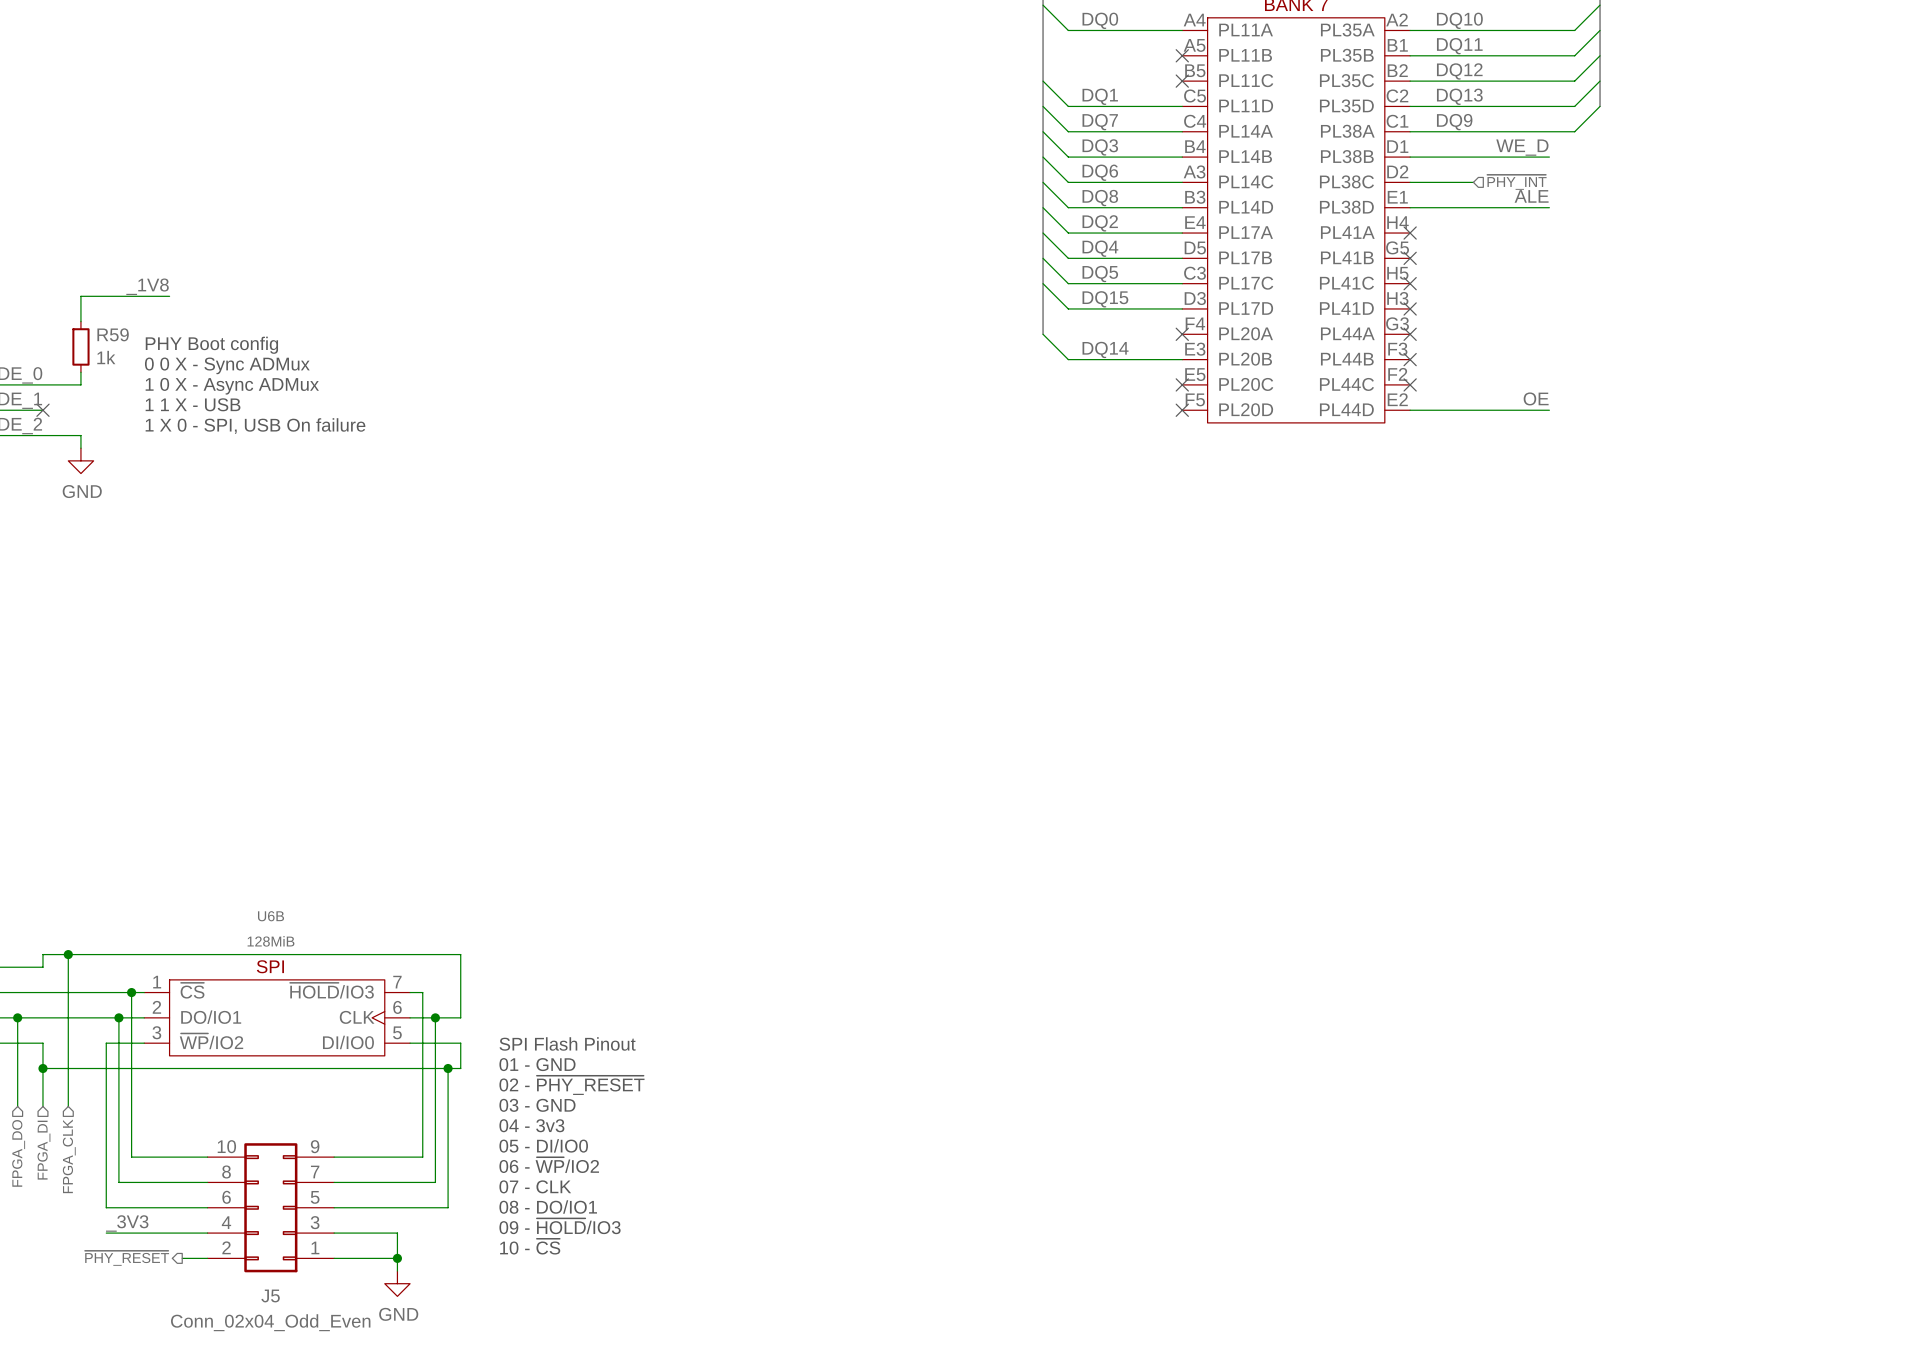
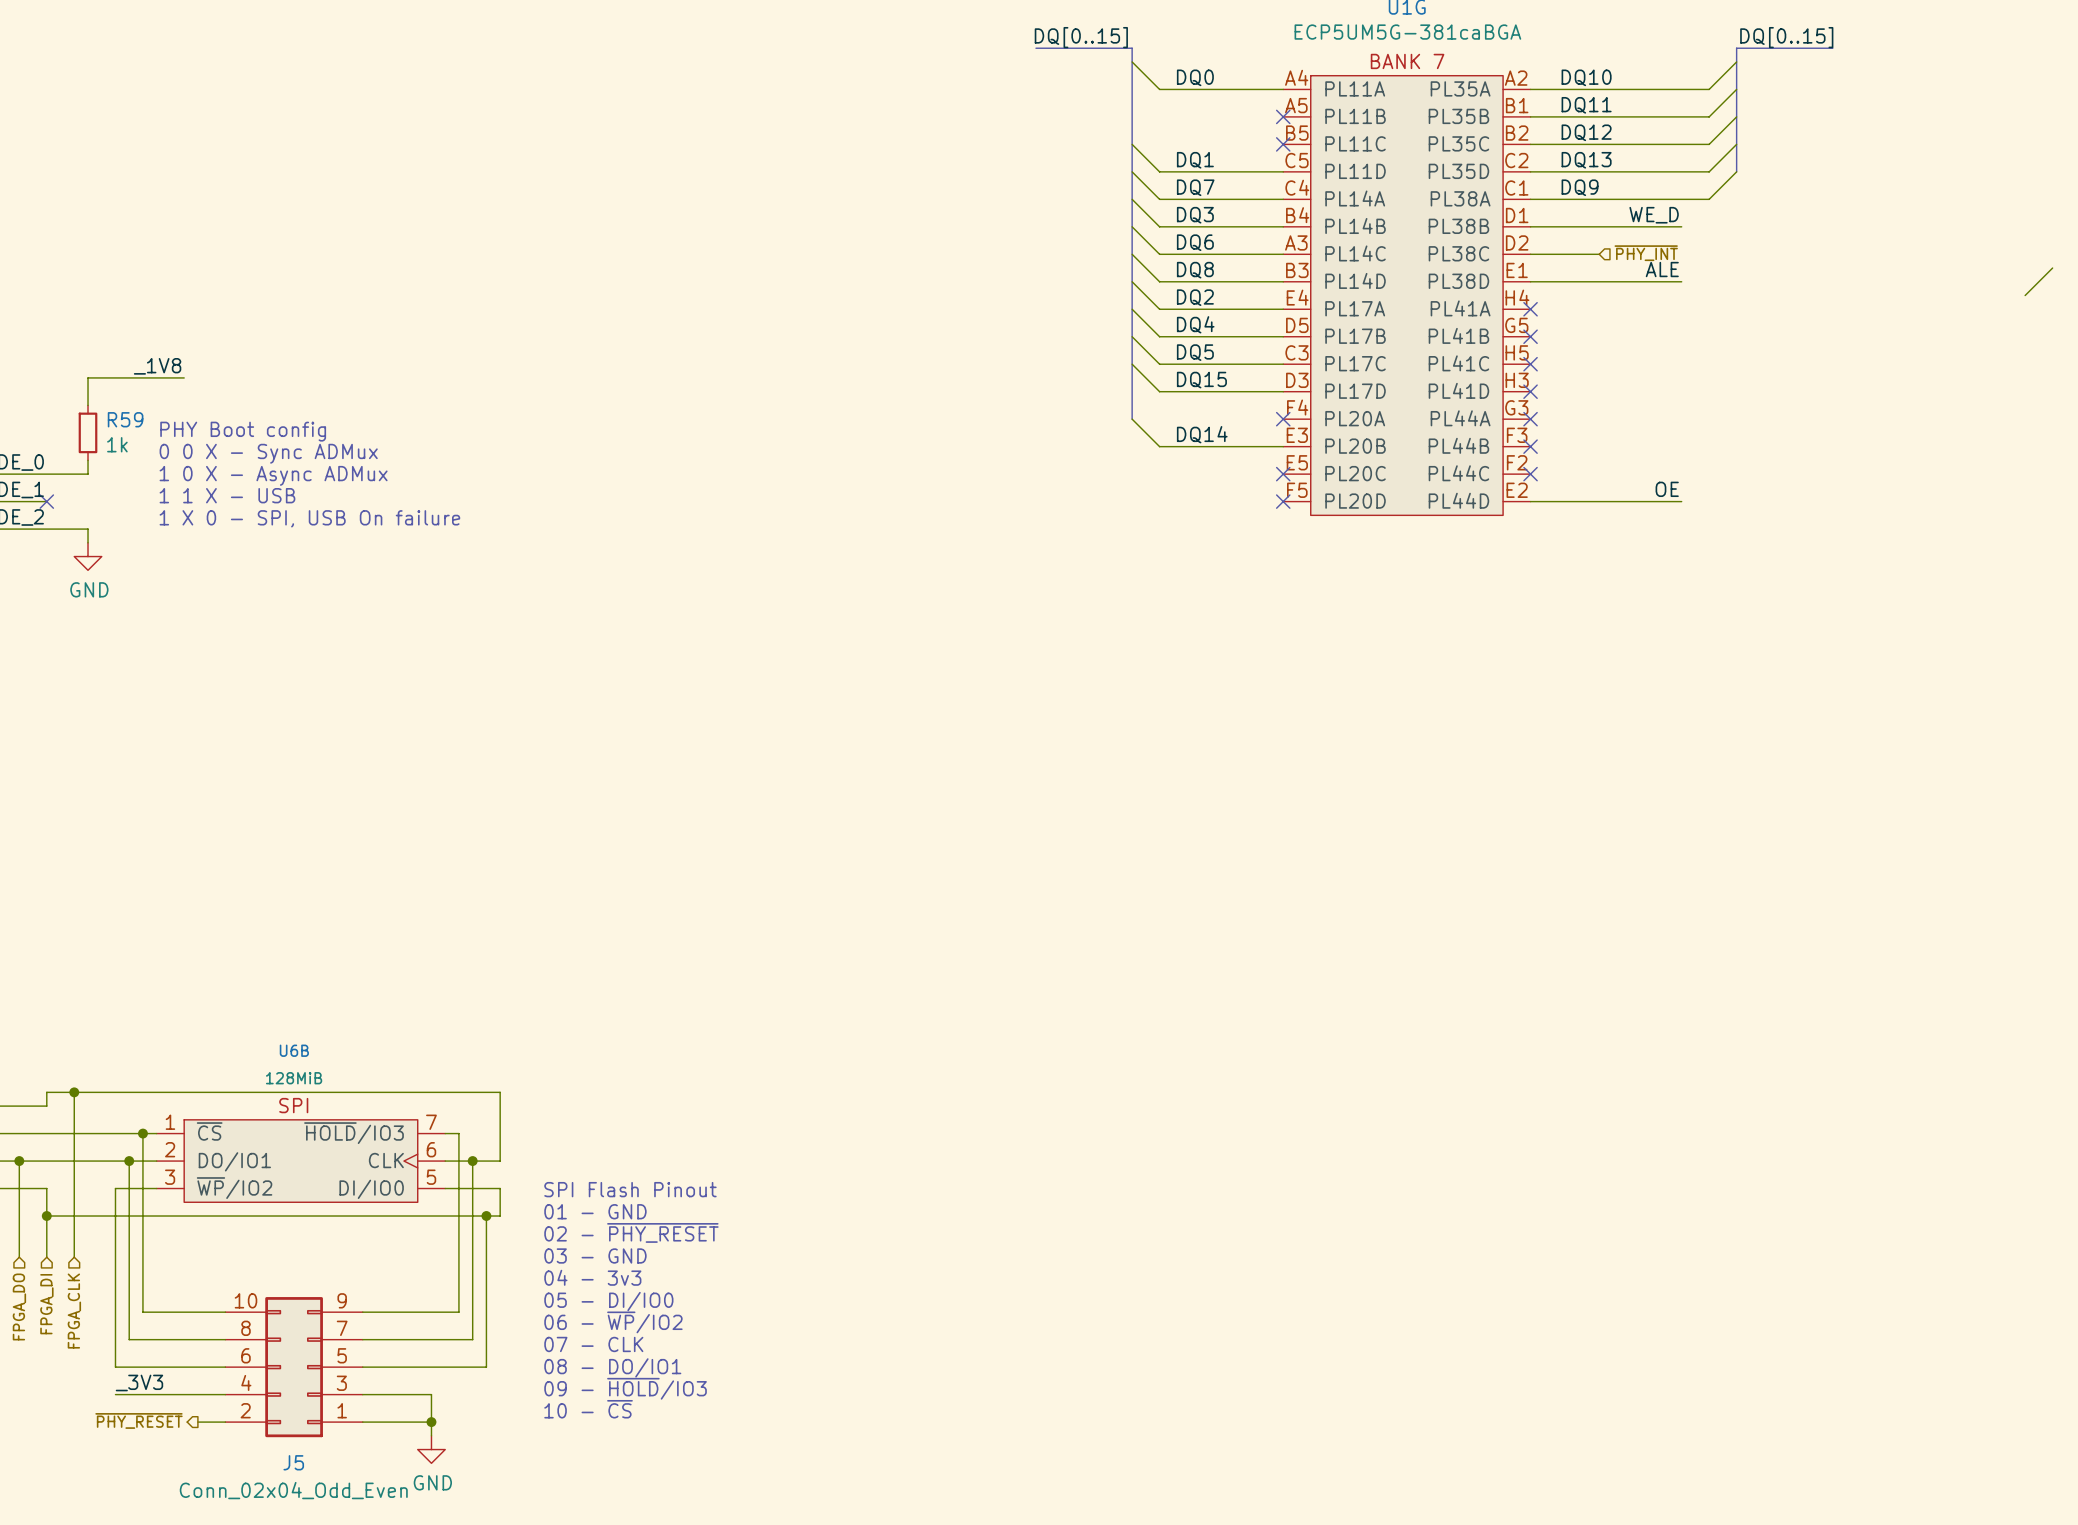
wire: none -> (2052, 268) (2025, 295)

